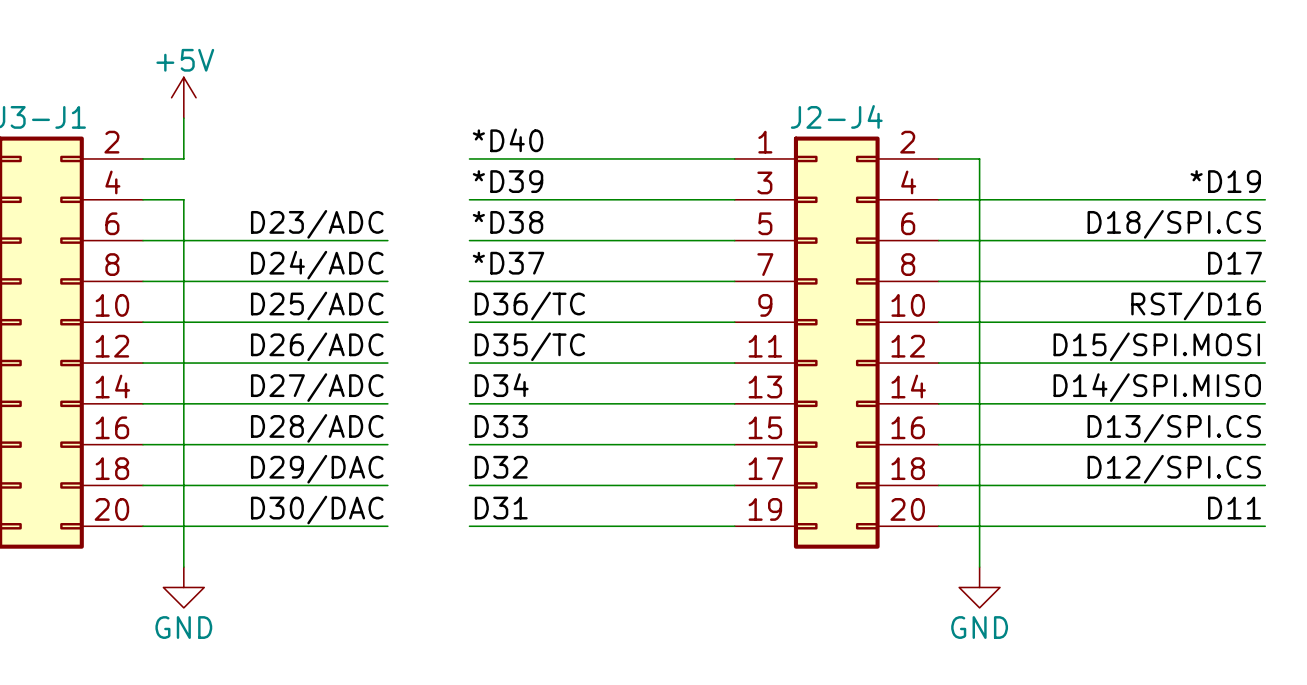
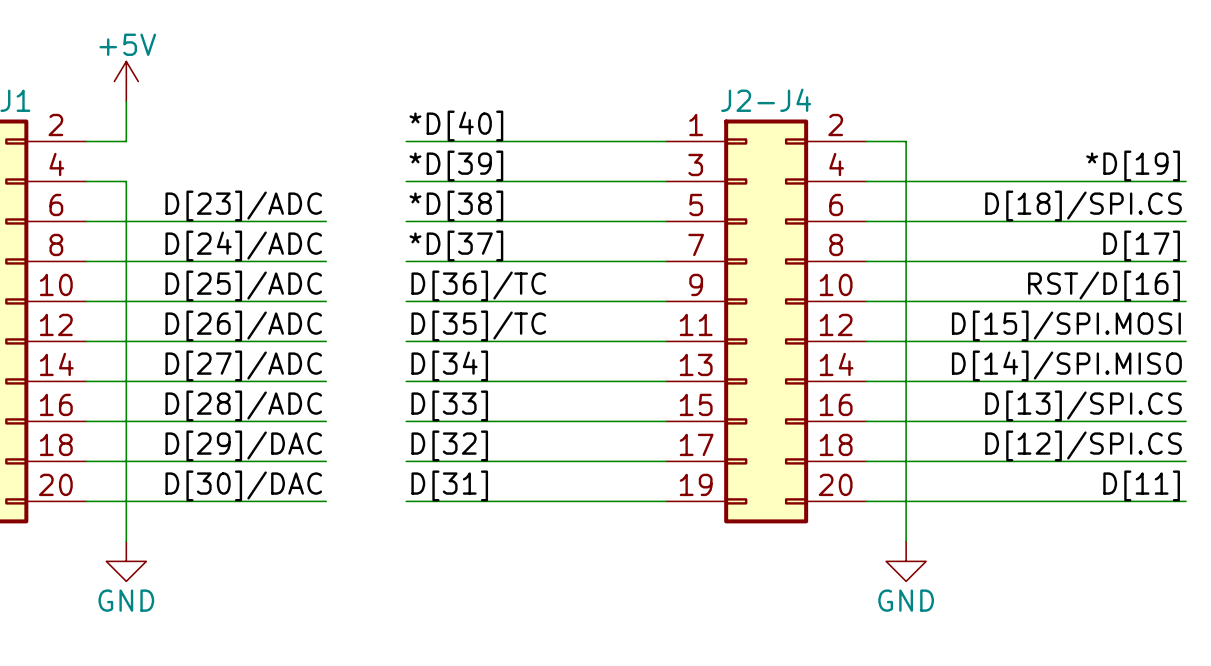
label: *D40 (508, 140) -> *D[40] (456, 126)
label: *D39 (508, 181) -> *D[39] (456, 166)
label: *D19 (1225, 181) -> *D[19] (1133, 166)
label: *D38 (508, 222) -> *D[38] (456, 206)
label: D23/ADC (317, 224) -> D[23]/ADC (243, 206)
label: D18/SPI.CS (1174, 224) -> D[18]/SPI.CS (1083, 206)
label: *D37 (508, 263) -> *D[37] (456, 245)
label: D17 (1234, 263) -> D[17] (1141, 245)
label: D24/ADC (317, 265) -> D[24]/ADC (243, 245)
label: D25/ADC (317, 305) -> D[25]/ADC (243, 285)
label: D36/TC (529, 305) -> D[36]/TC (478, 285)
label: RST/D16 (1196, 305) -> RST/D[16] (1104, 285)
label: D26/ADC (317, 346) -> D[26]/ADC (243, 325)
label: D35/TC (529, 346) -> D[35]/TC (478, 325)
label: D15/SPI.MOSI (1156, 346) -> D[15]/SPI.MOSI (1066, 325)
label: D34 (501, 385) -> D[34] (449, 365)
label: D27/ADC (317, 387) -> D[27]/ADC (243, 365)
label: D14/SPI.MISO (1157, 387) -> D[14]/SPI.MISO (1066, 365)
label: D33 (501, 426) -> D[33] (449, 405)
label: D28/ADC (317, 428) -> D[28]/ADC (243, 405)
label: D13/SPI.CS (1174, 428) -> D[13]/SPI.CS (1083, 405)
label: D32 (501, 467) -> D[32] (449, 445)
label: D29/DAC (317, 469) -> D[29]/DAC (243, 445)
label: D12/SPI.CS (1174, 469) -> D[12]/SPI.CS (1083, 445)
label: D31 (501, 508) -> D[31] (449, 485)
label: D11 (1234, 508) -> D[11] (1141, 485)
label: D30/DAC (317, 510) -> D[30]/DAC (243, 485)

